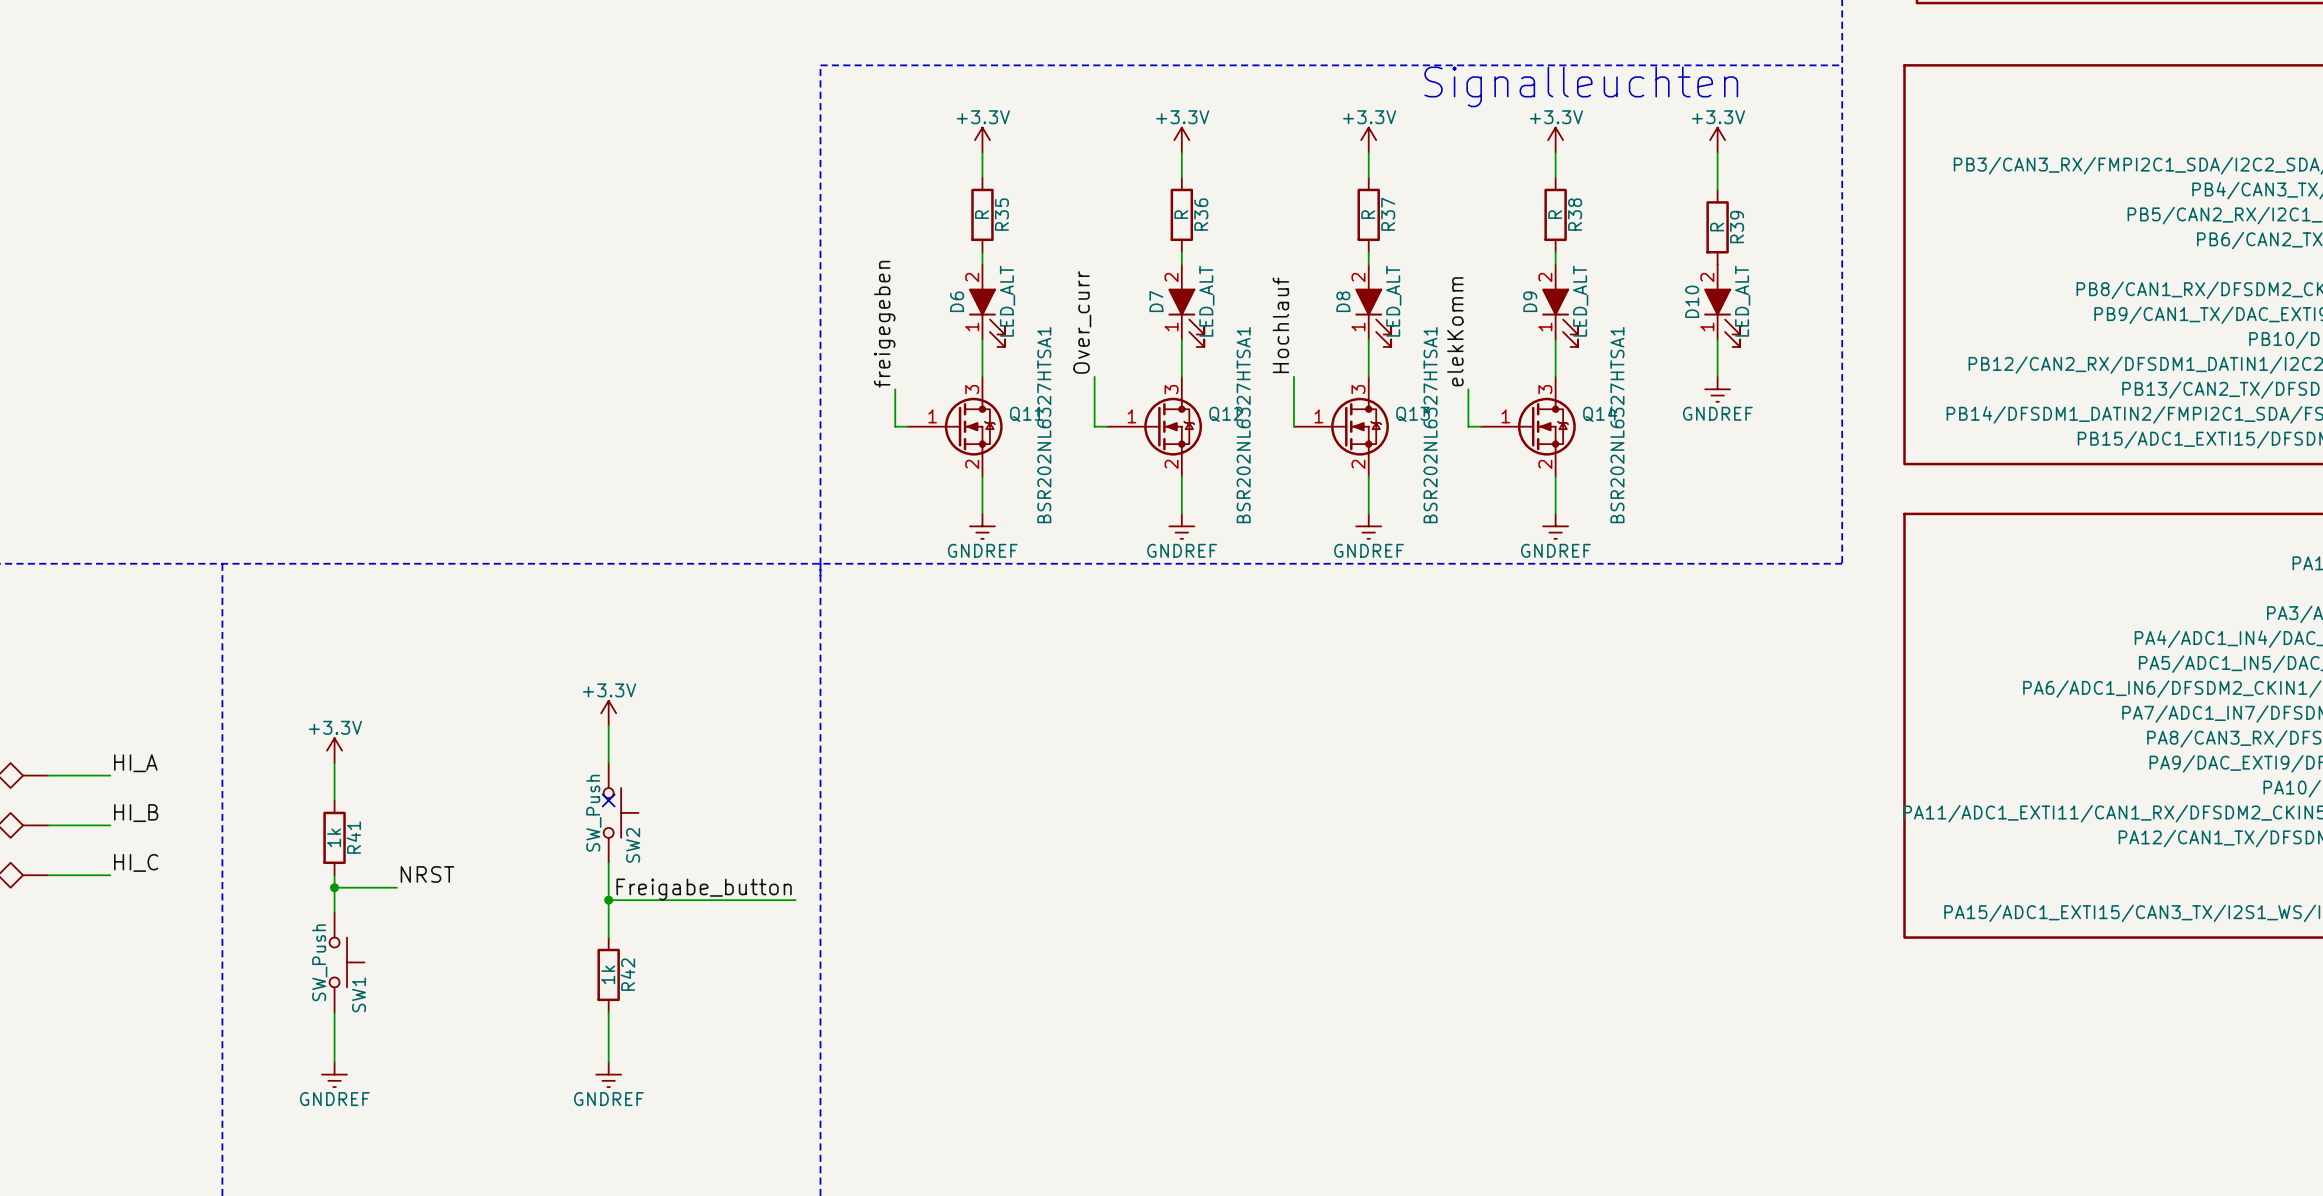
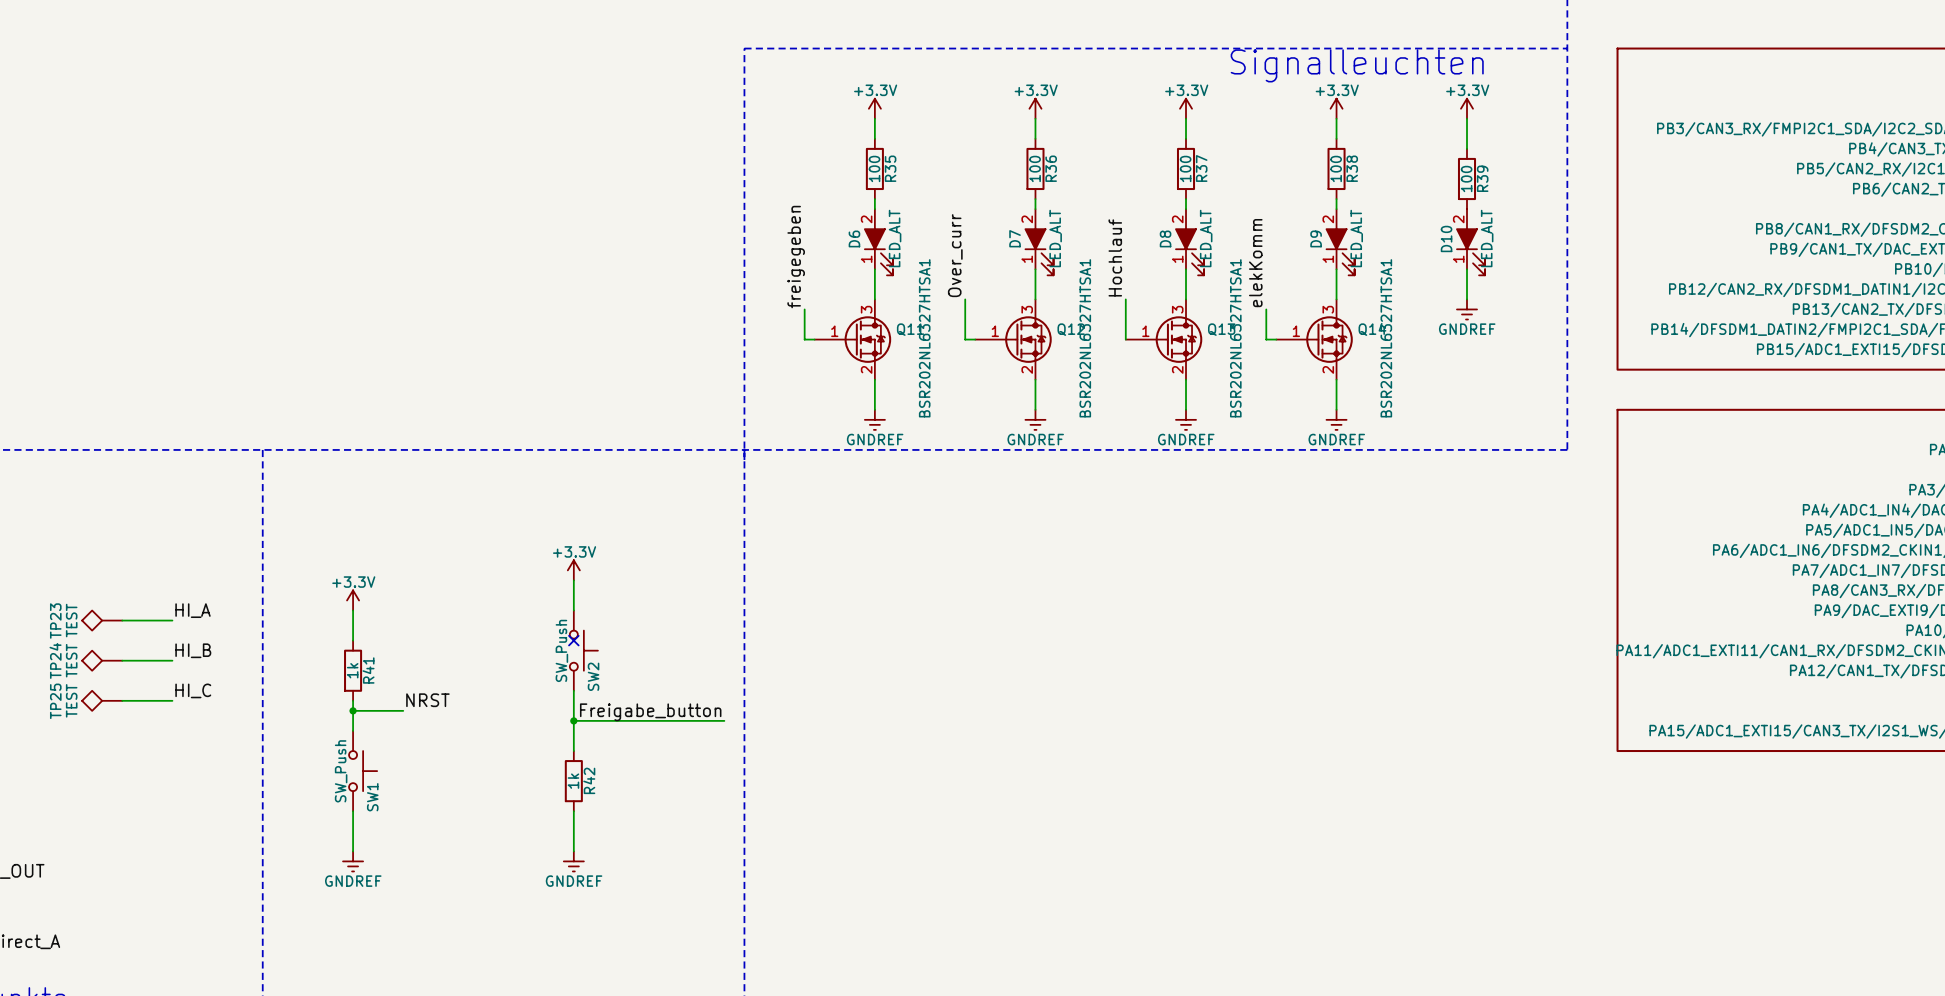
R35 value: R (982, 214) -> 100 (874, 168)
R36 value: R (1181, 214) -> 100 (1035, 168)
R37 value: R (1368, 214) -> 100 (1185, 168)
R38 value: R (1555, 214) -> 100 (1336, 168)
R39 value: R (1717, 227) -> 100 (1466, 179)

